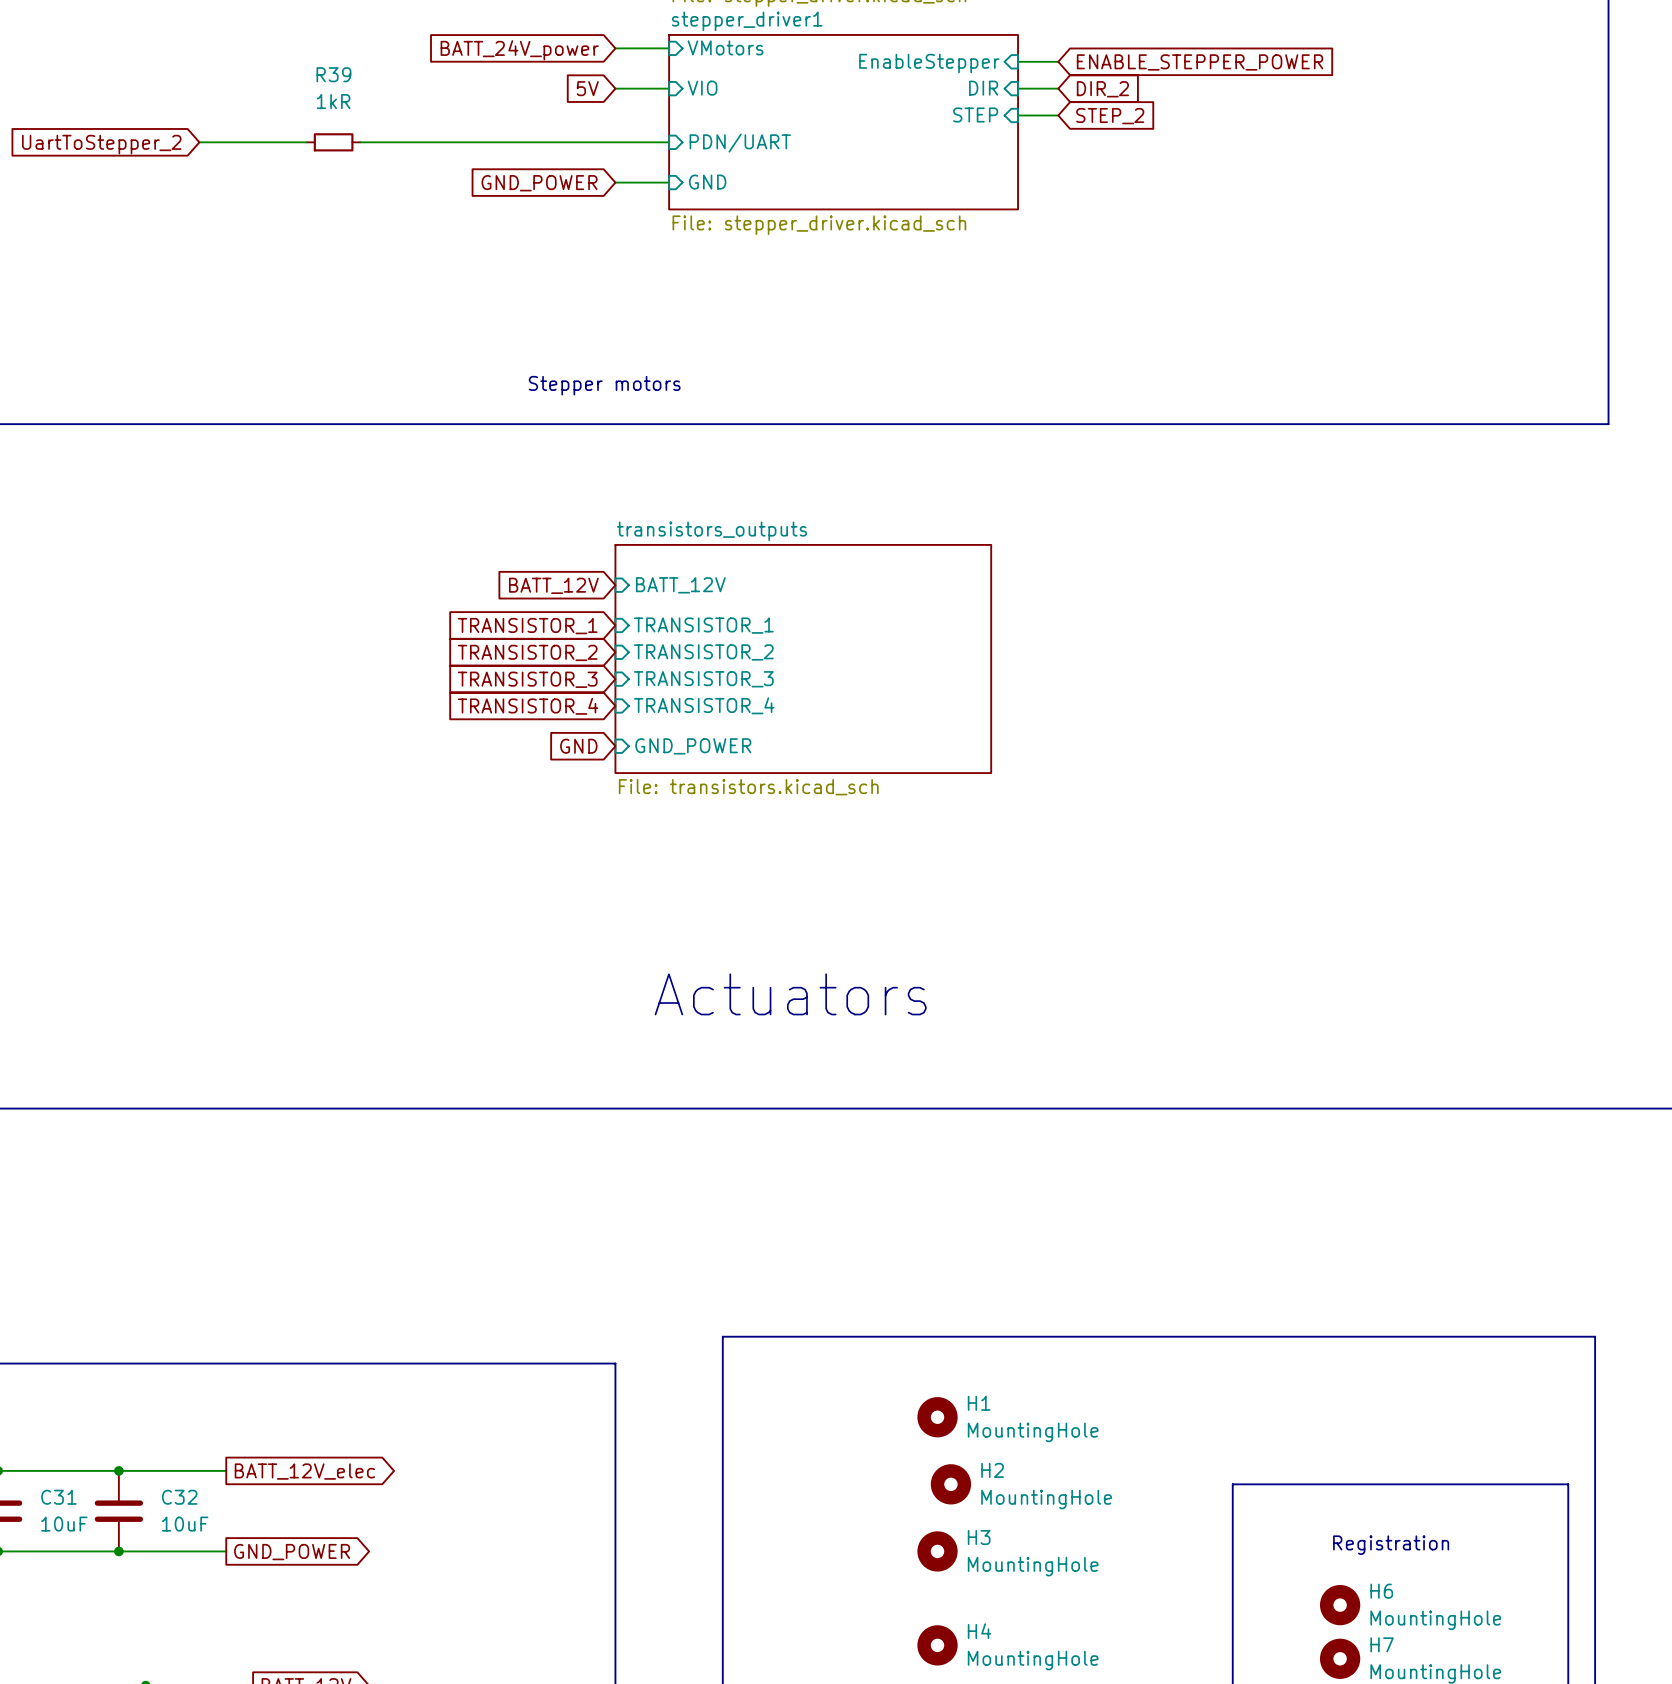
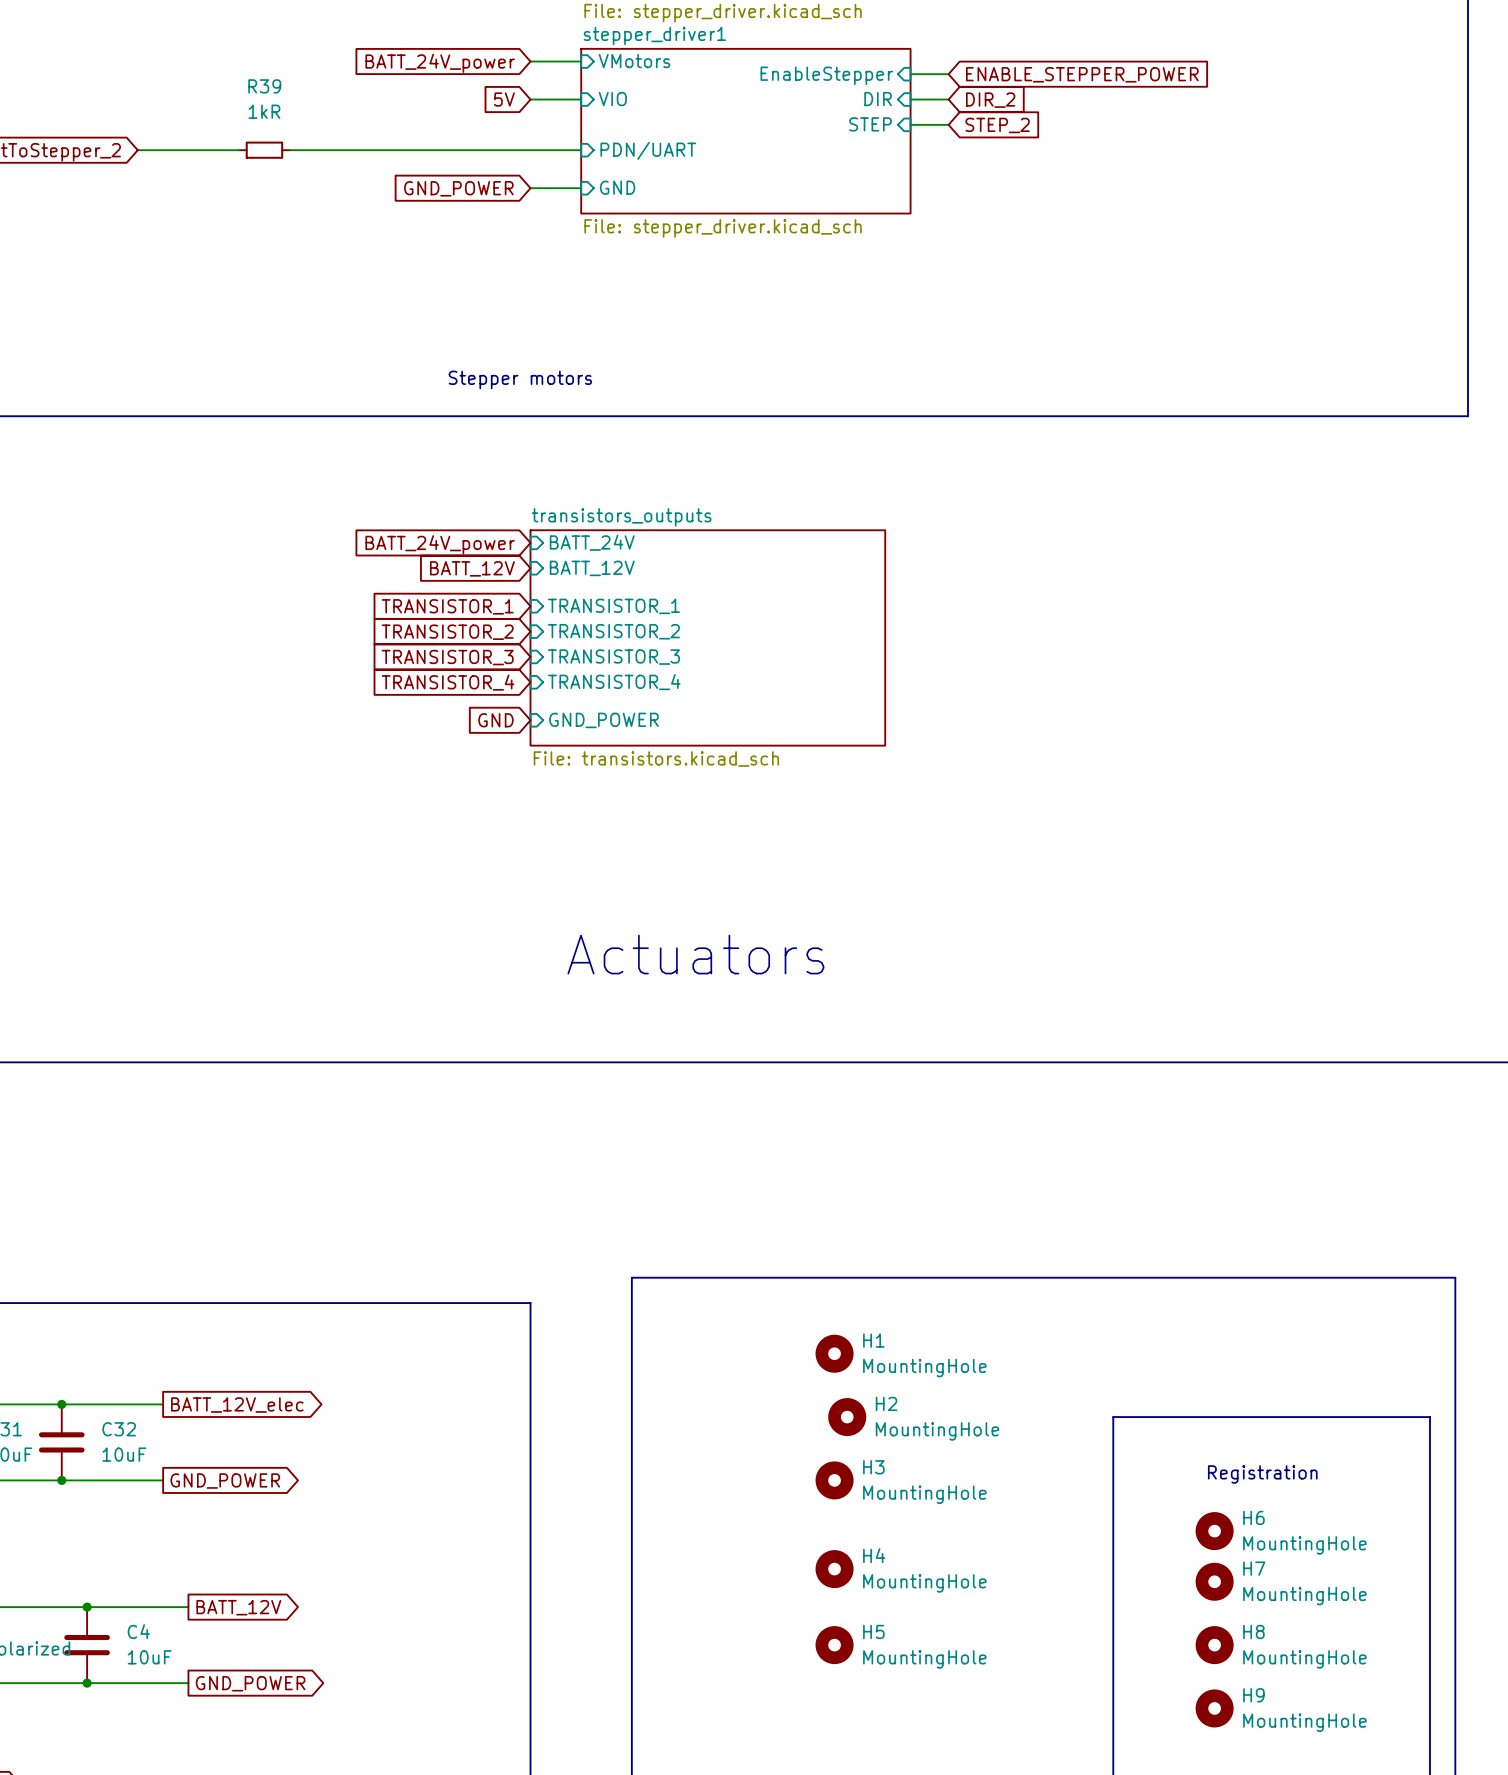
sheet pin: none -> BATT_24V (592, 542)
global label: none -> BATT_24V_power (440, 544)

